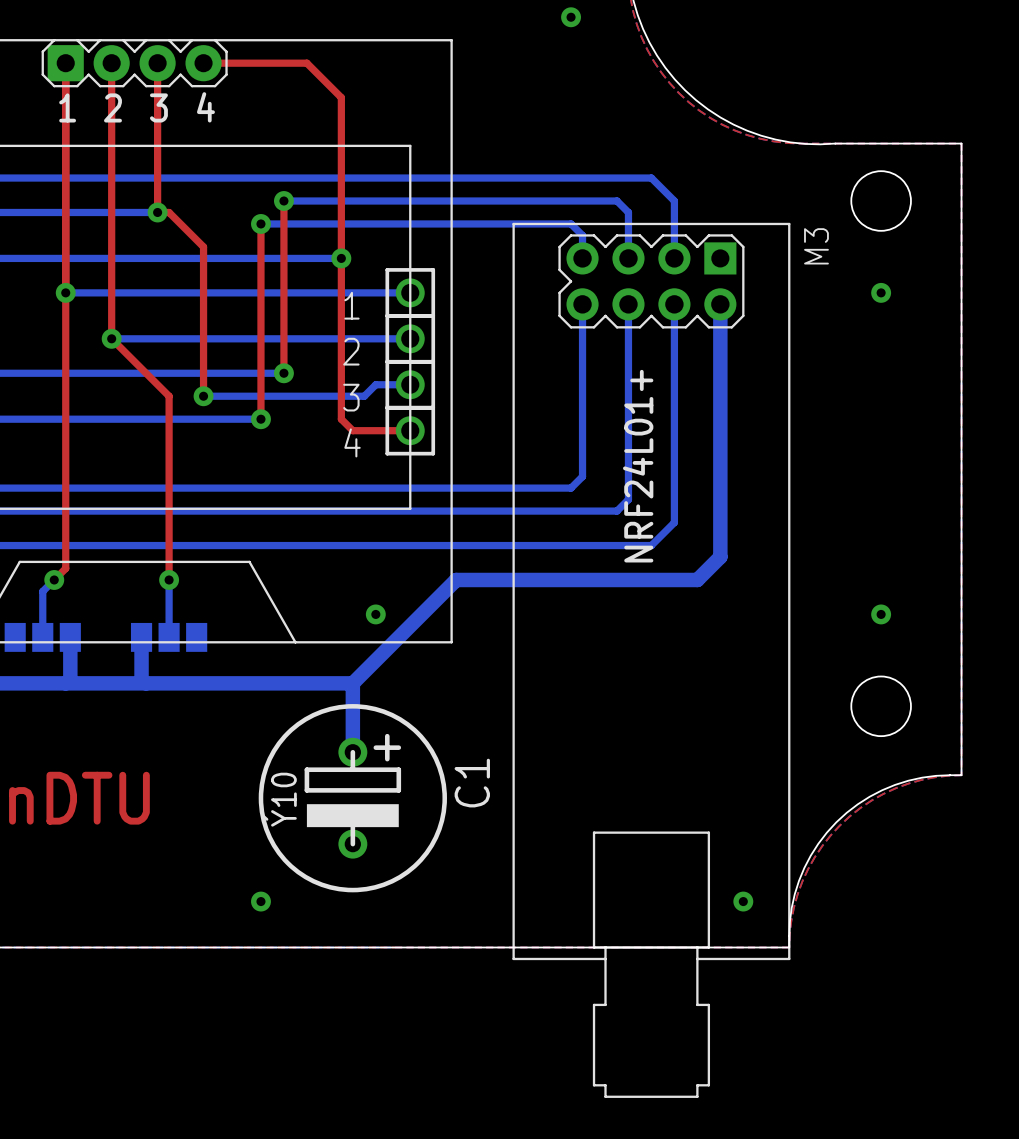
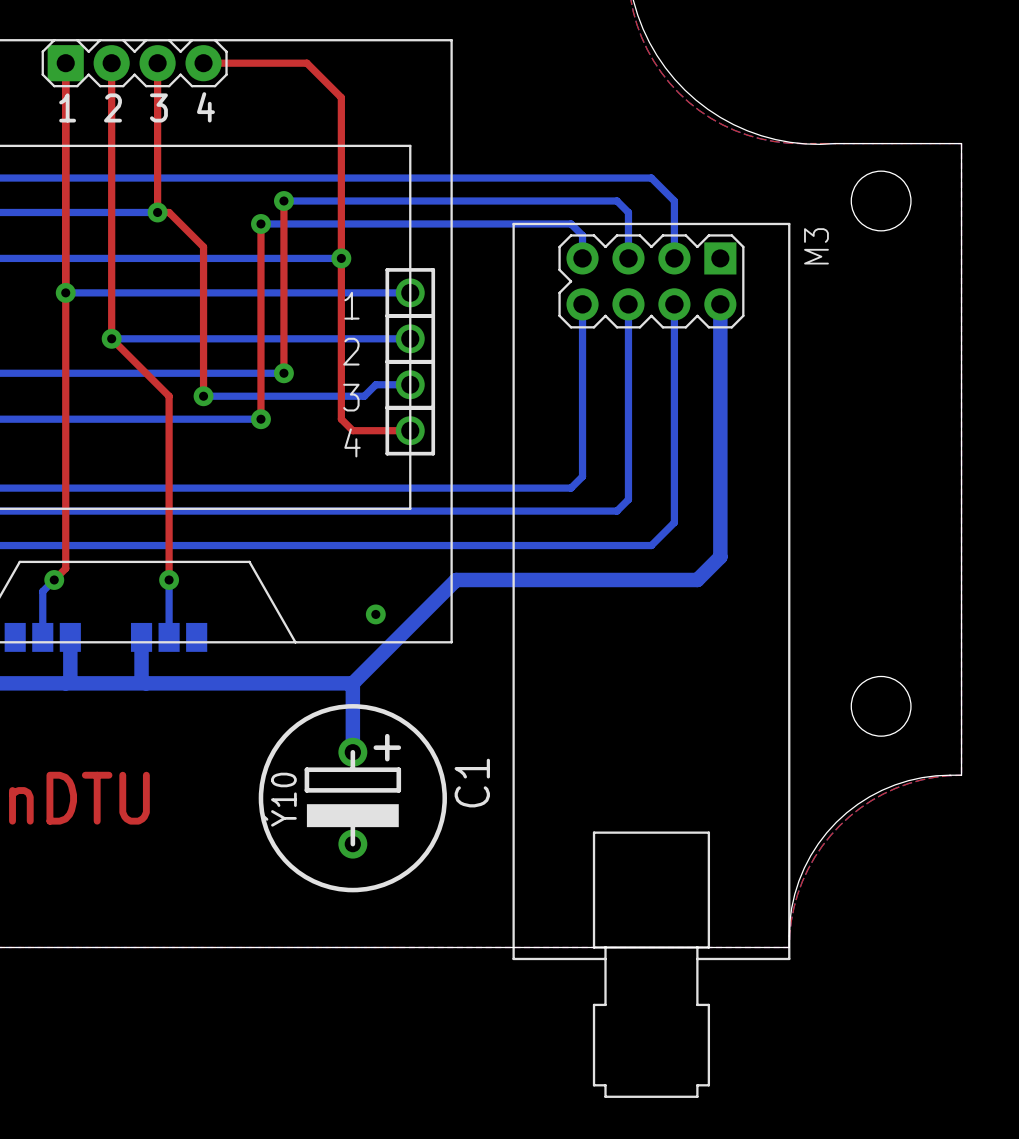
via: (571, 17) -> none
via: (881, 292) -> none
text: NRF24L01+ (638, 466) -> none
via: (881, 614) -> none
via: (260, 901) -> none
via: (743, 901) -> none

